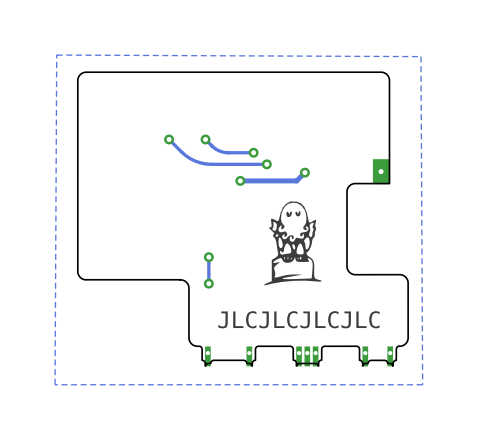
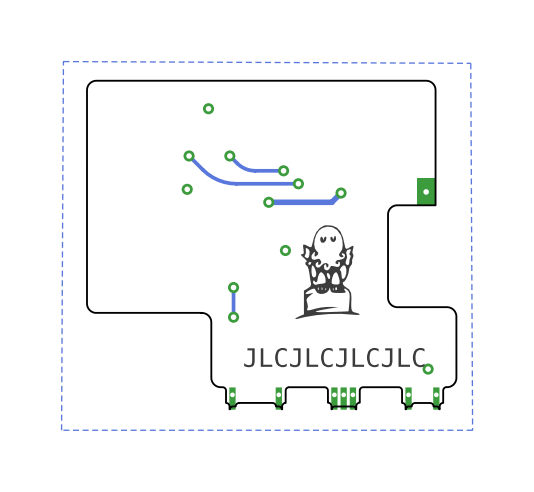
via: none -> (208, 108)
via: none -> (187, 189)
via: none -> (285, 250)
via: none -> (428, 369)

